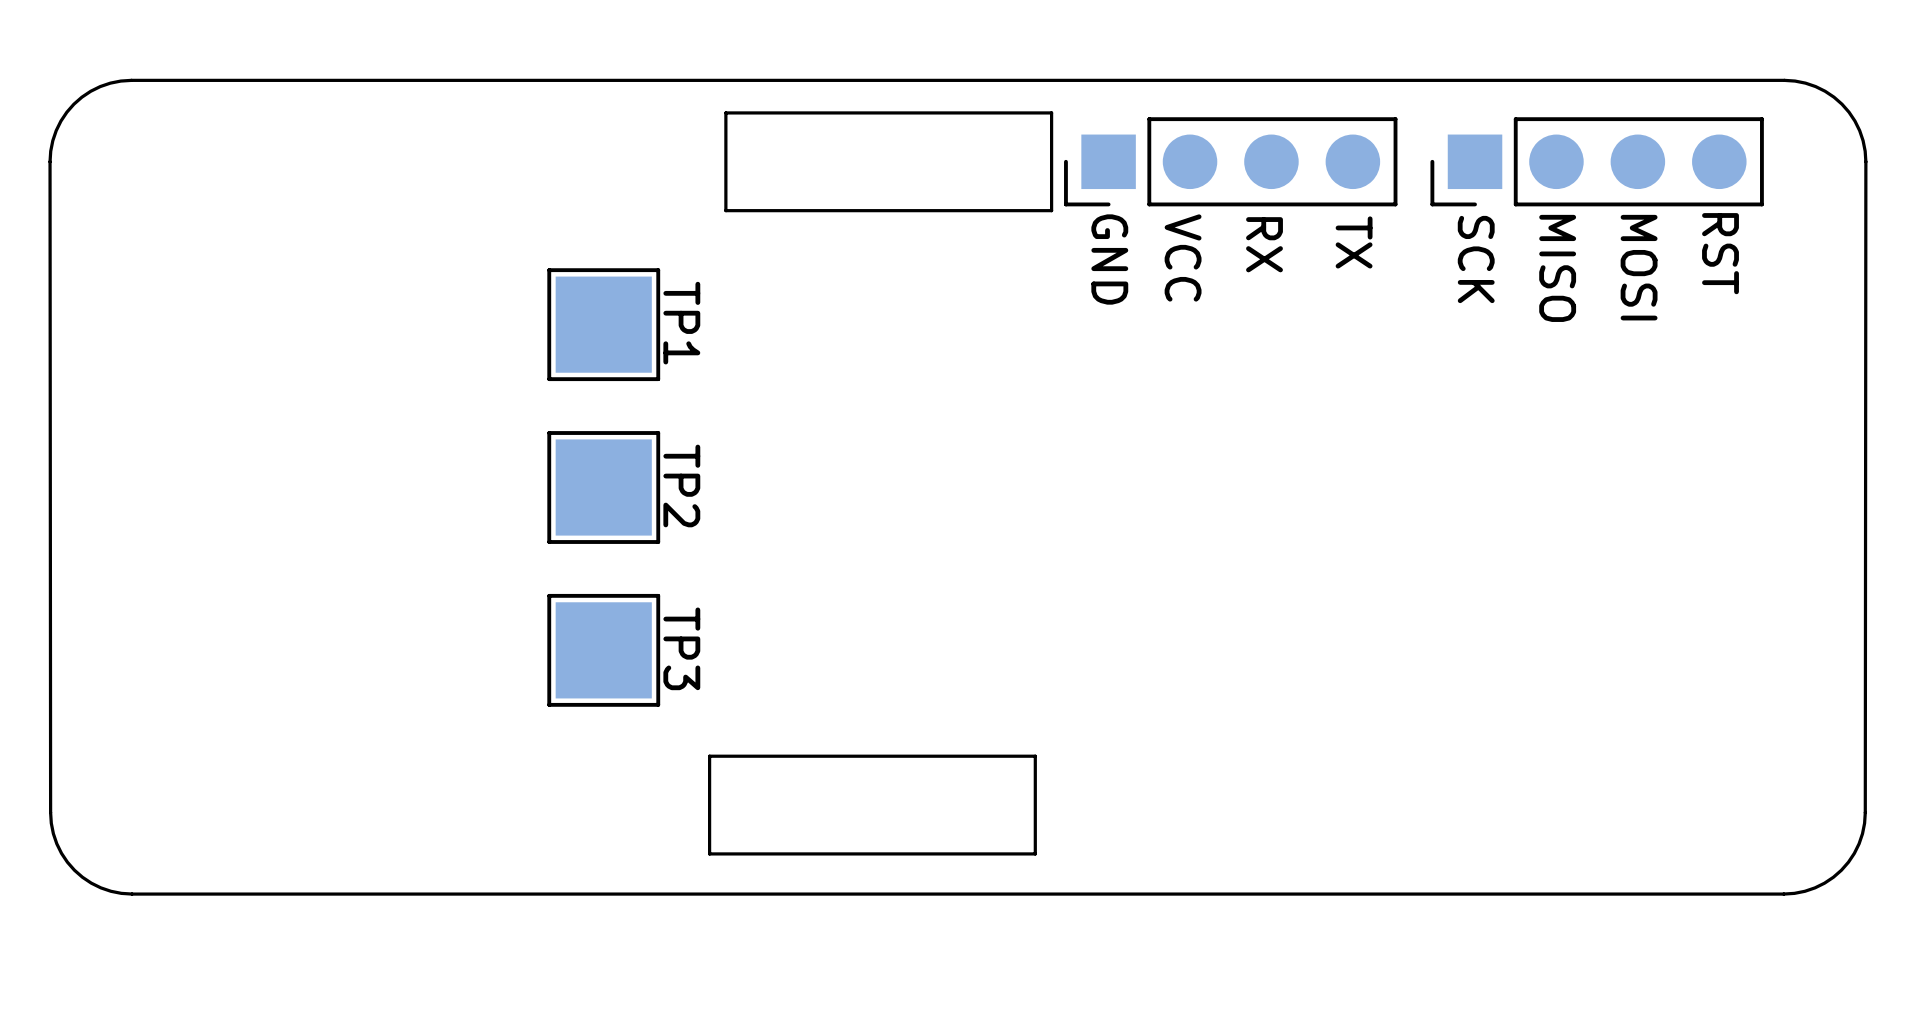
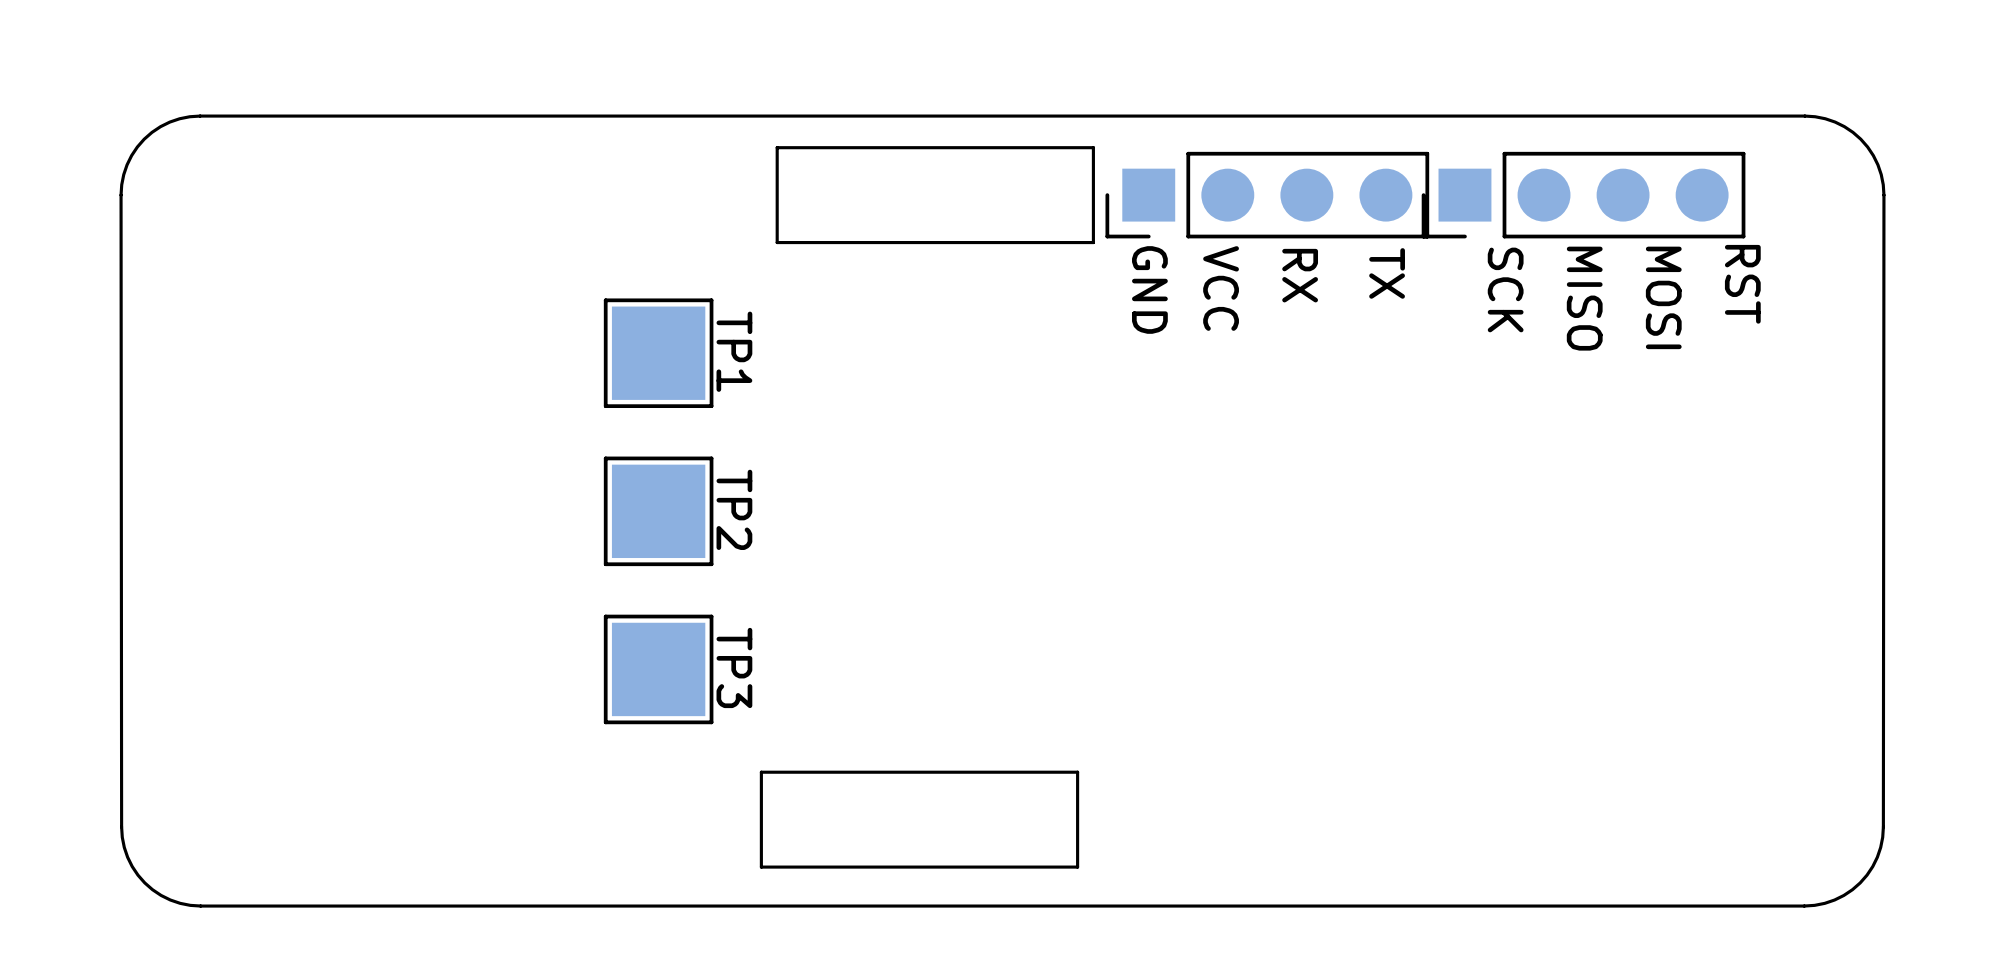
part position: (1597, 161) -> (1583, 195)

